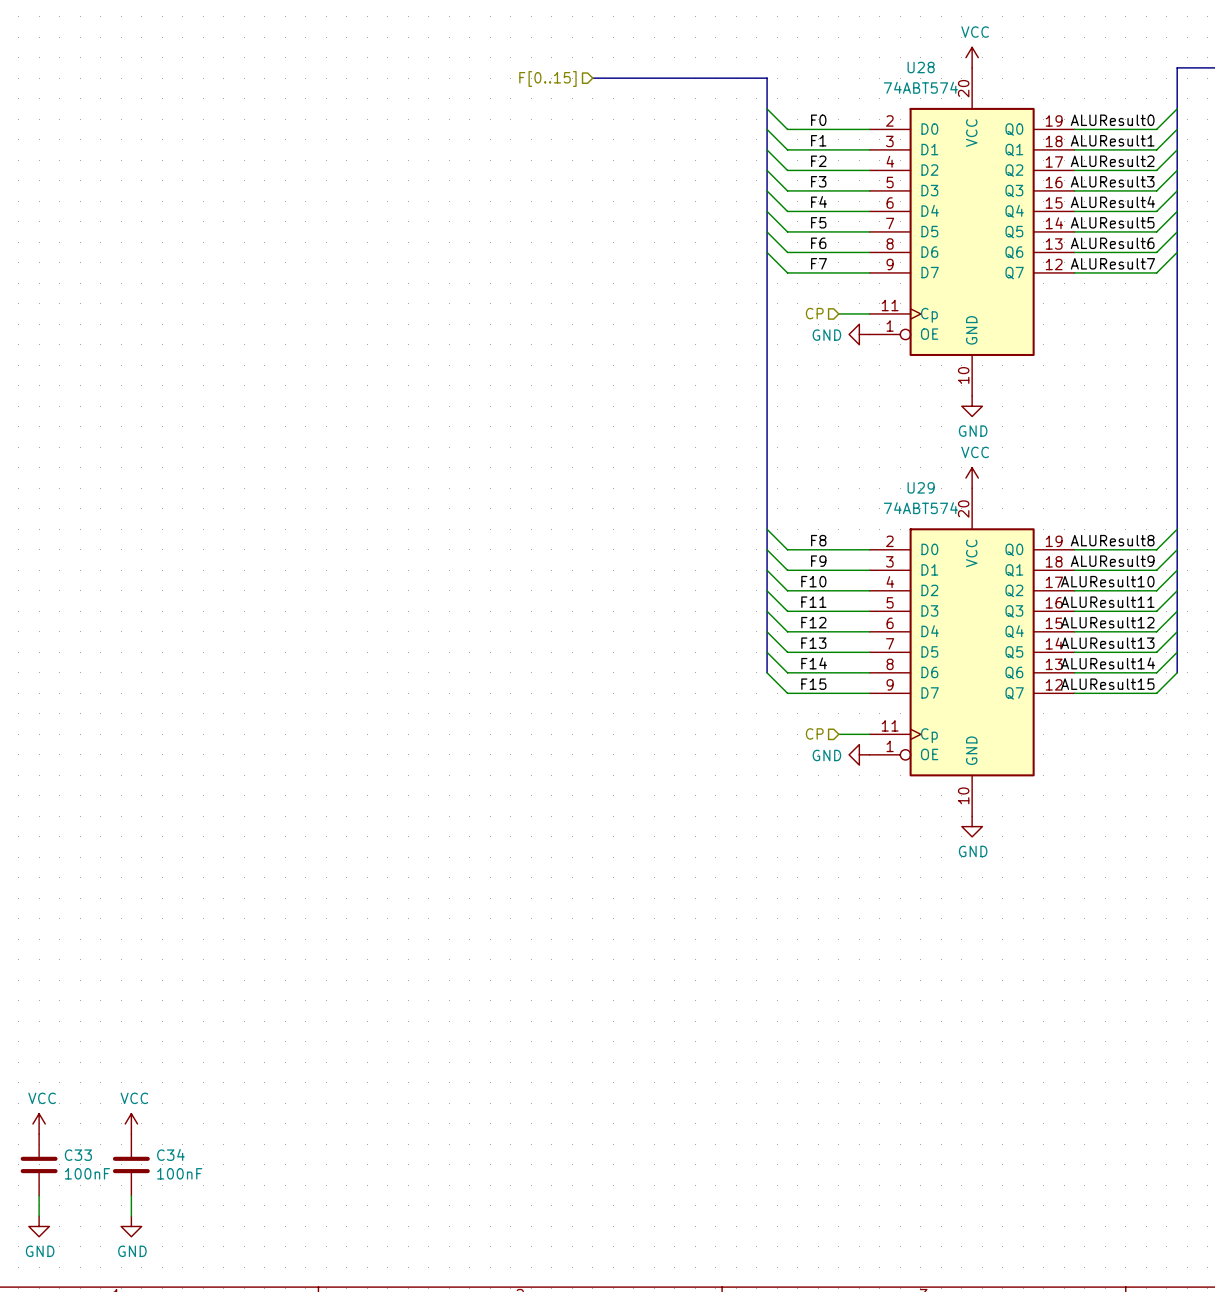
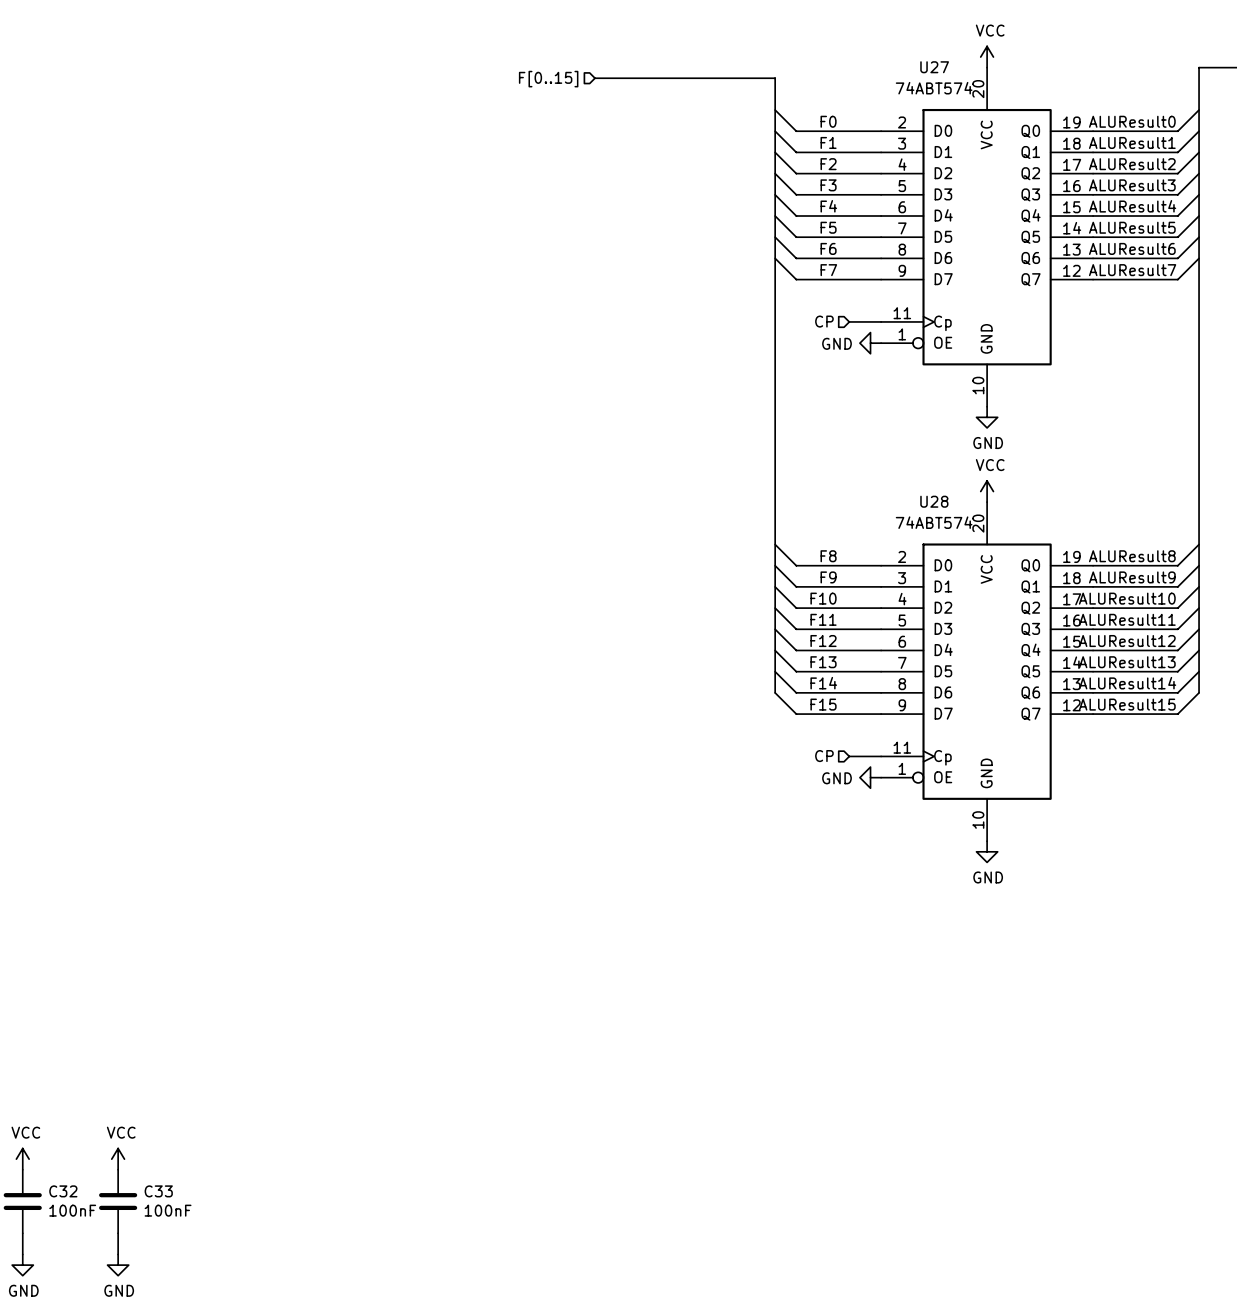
U28 name: U28 (921, 67) -> U27 (934, 67)
U29 name: U29 (921, 487) -> U28 (934, 501)
C34 name: C34 (170, 1154) -> C33 (158, 1191)
C33 name: C33 (78, 1155) -> C32 (63, 1191)

